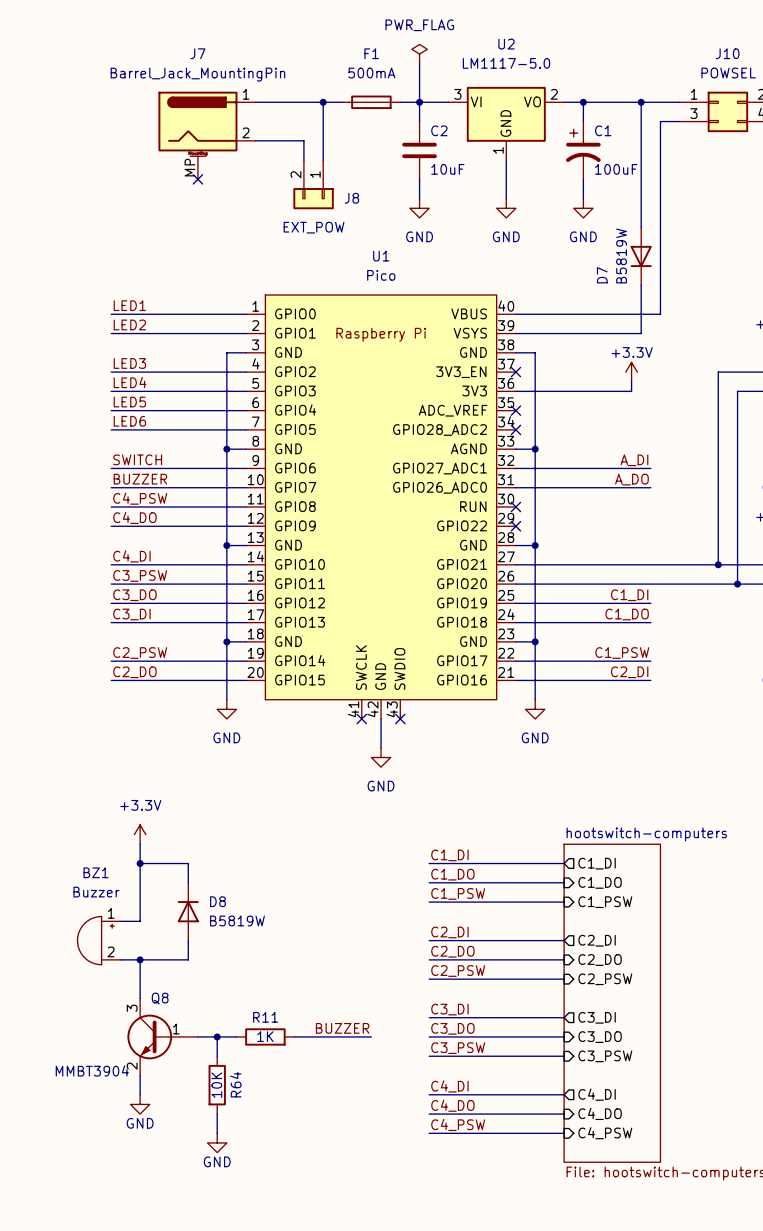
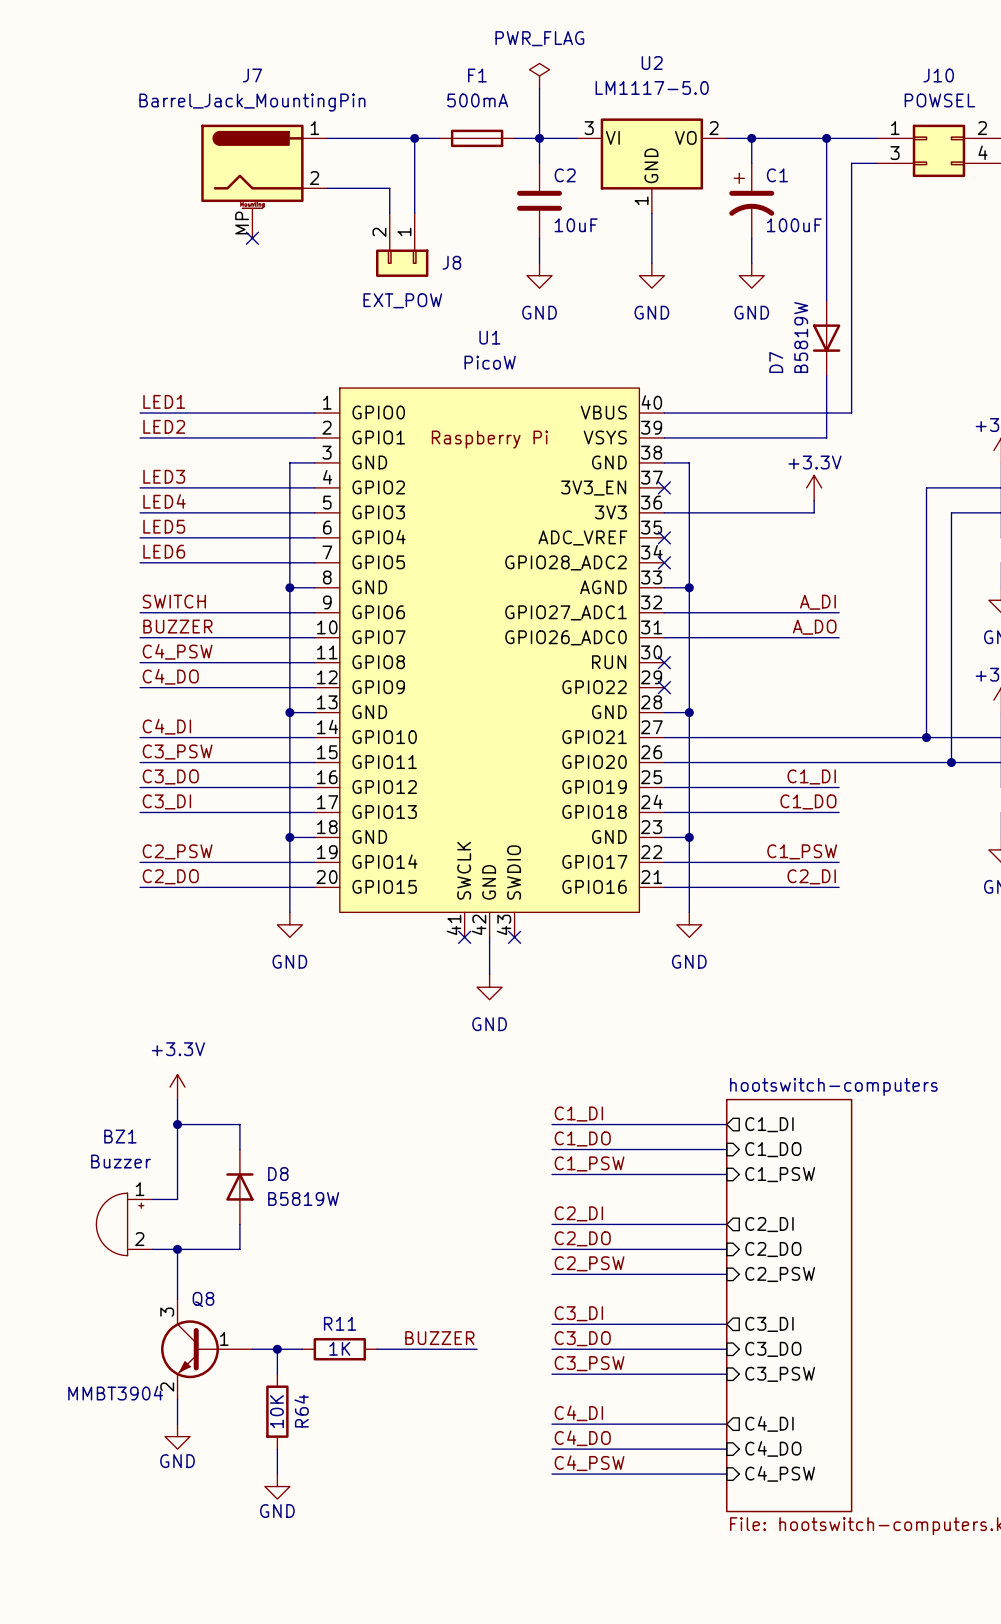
U1 value: Pico (381, 275) -> PicoW (490, 362)

